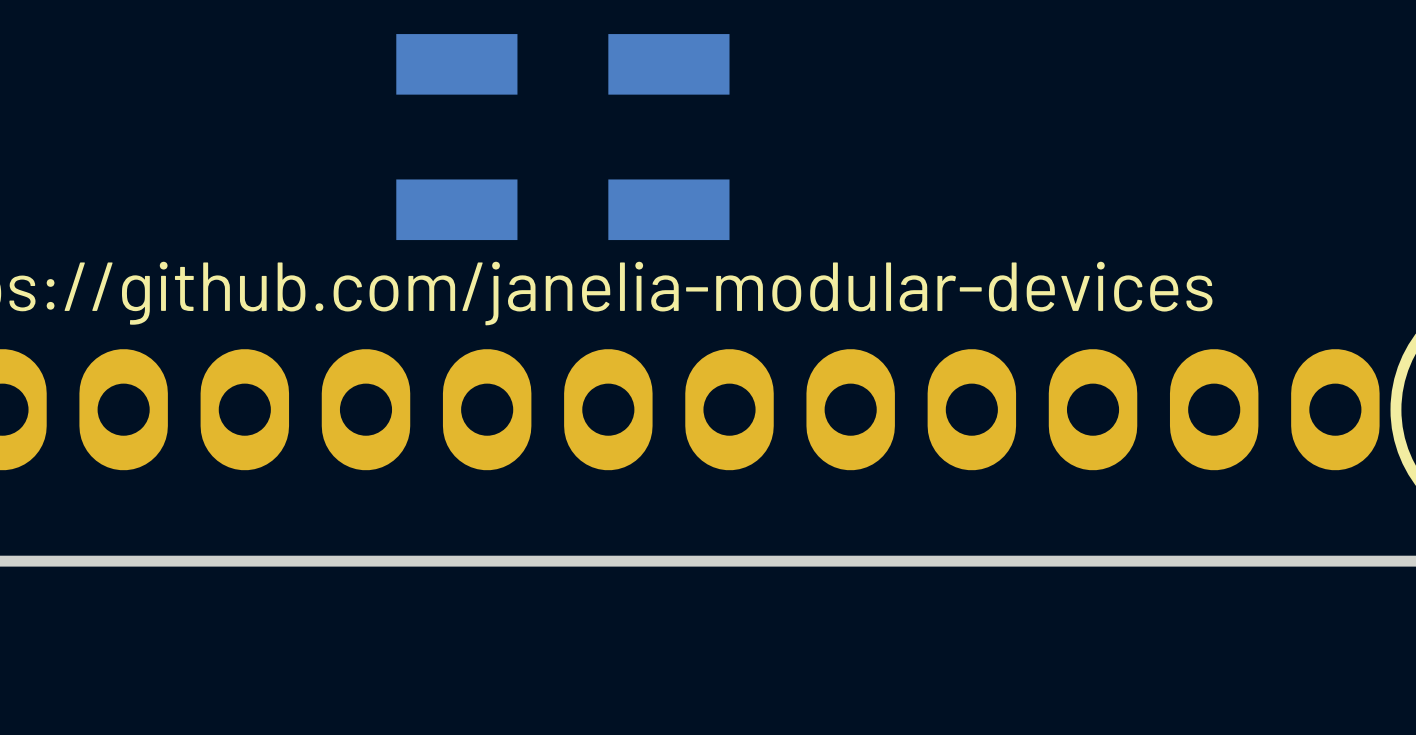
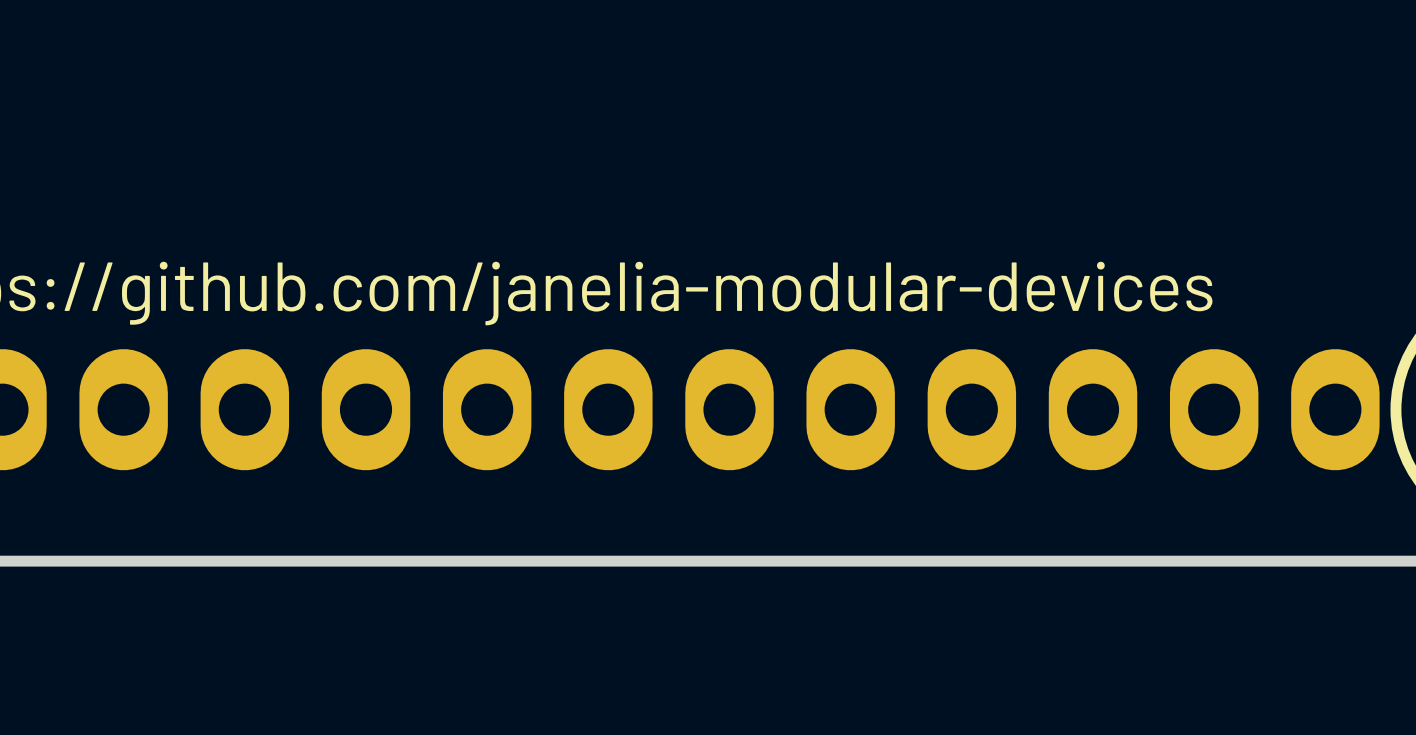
part: (456, 137) -> none
part: (668, 137) -> none

